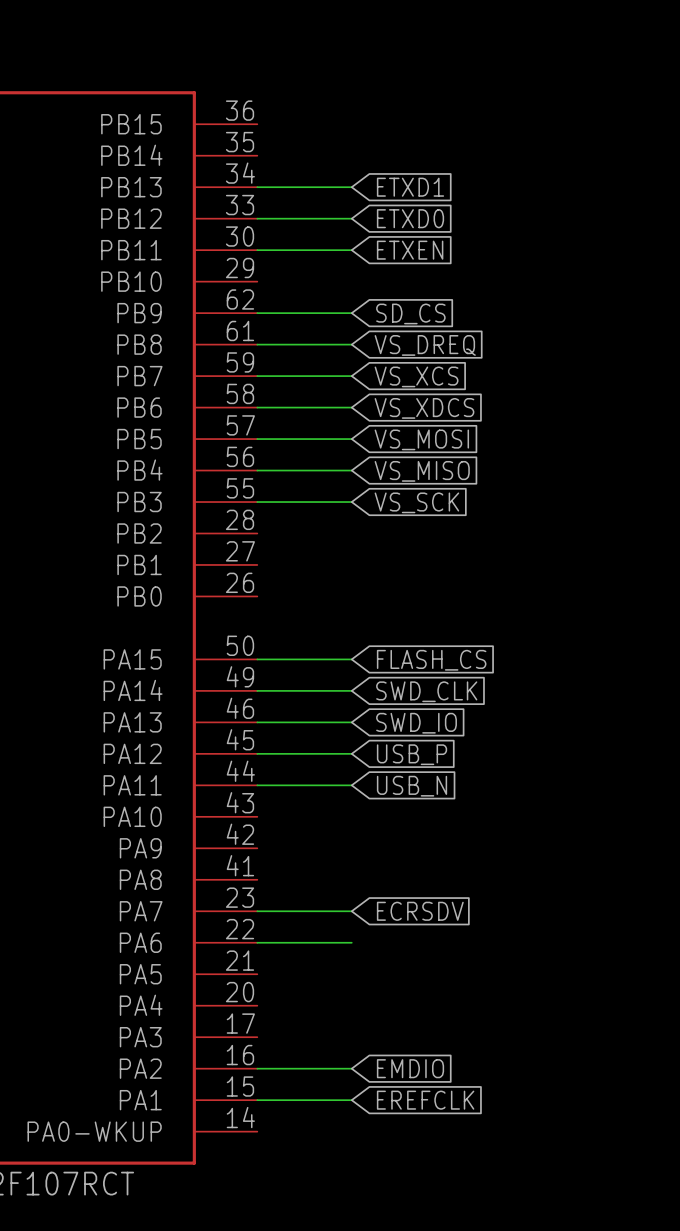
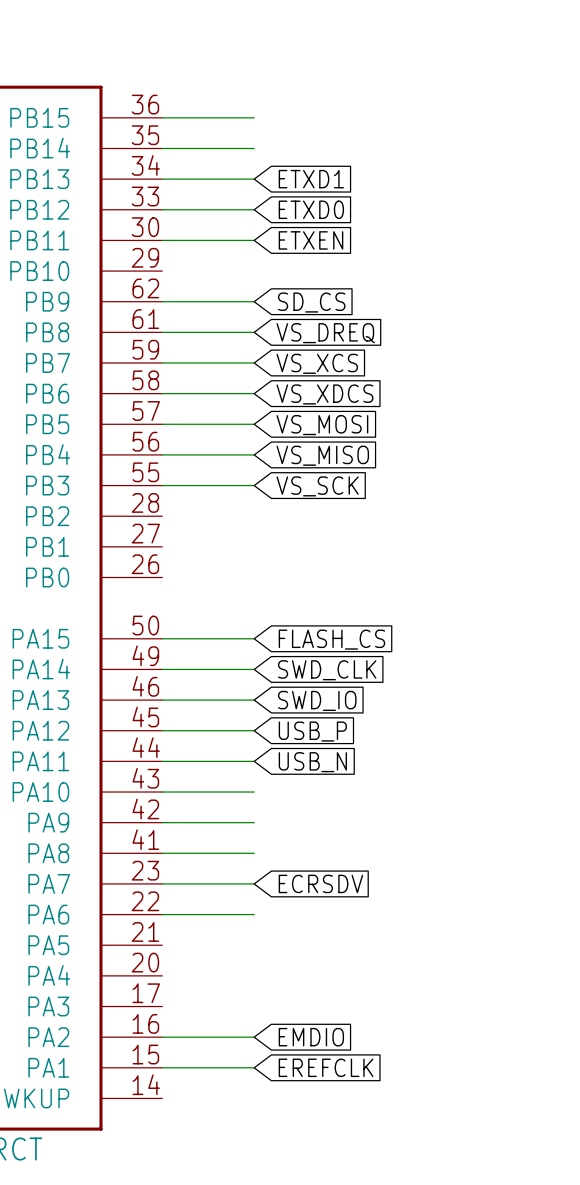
wire: none -> (162, 117) (254, 117)
wire: none -> (162, 148) (254, 148)
wire: none -> (162, 792) (254, 792)
wire: none -> (162, 822) (254, 822)
wire: none -> (162, 853) (254, 853)

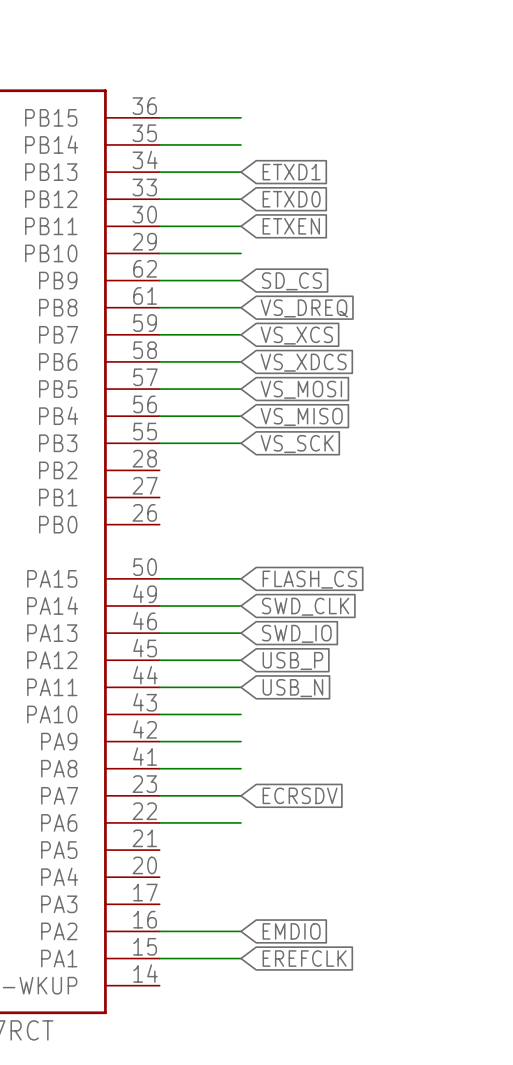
wire: none -> (159, 253) (241, 253)

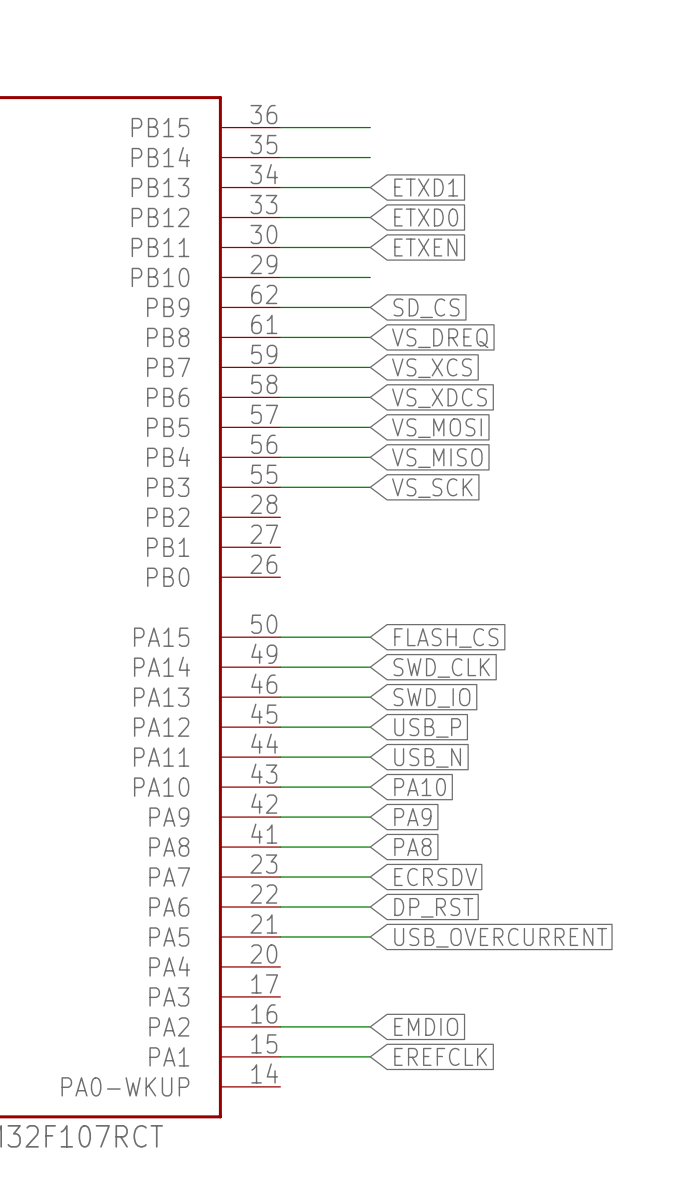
global label: none -> PA10 (420, 787)
global label: none -> PA9 (412, 817)
global label: none -> PA8 (412, 847)
global label: none -> DP_RST (433, 907)
wire: none -> (280, 936) (370, 936)
global label: none -> USB_OVERCURRENT (500, 937)

